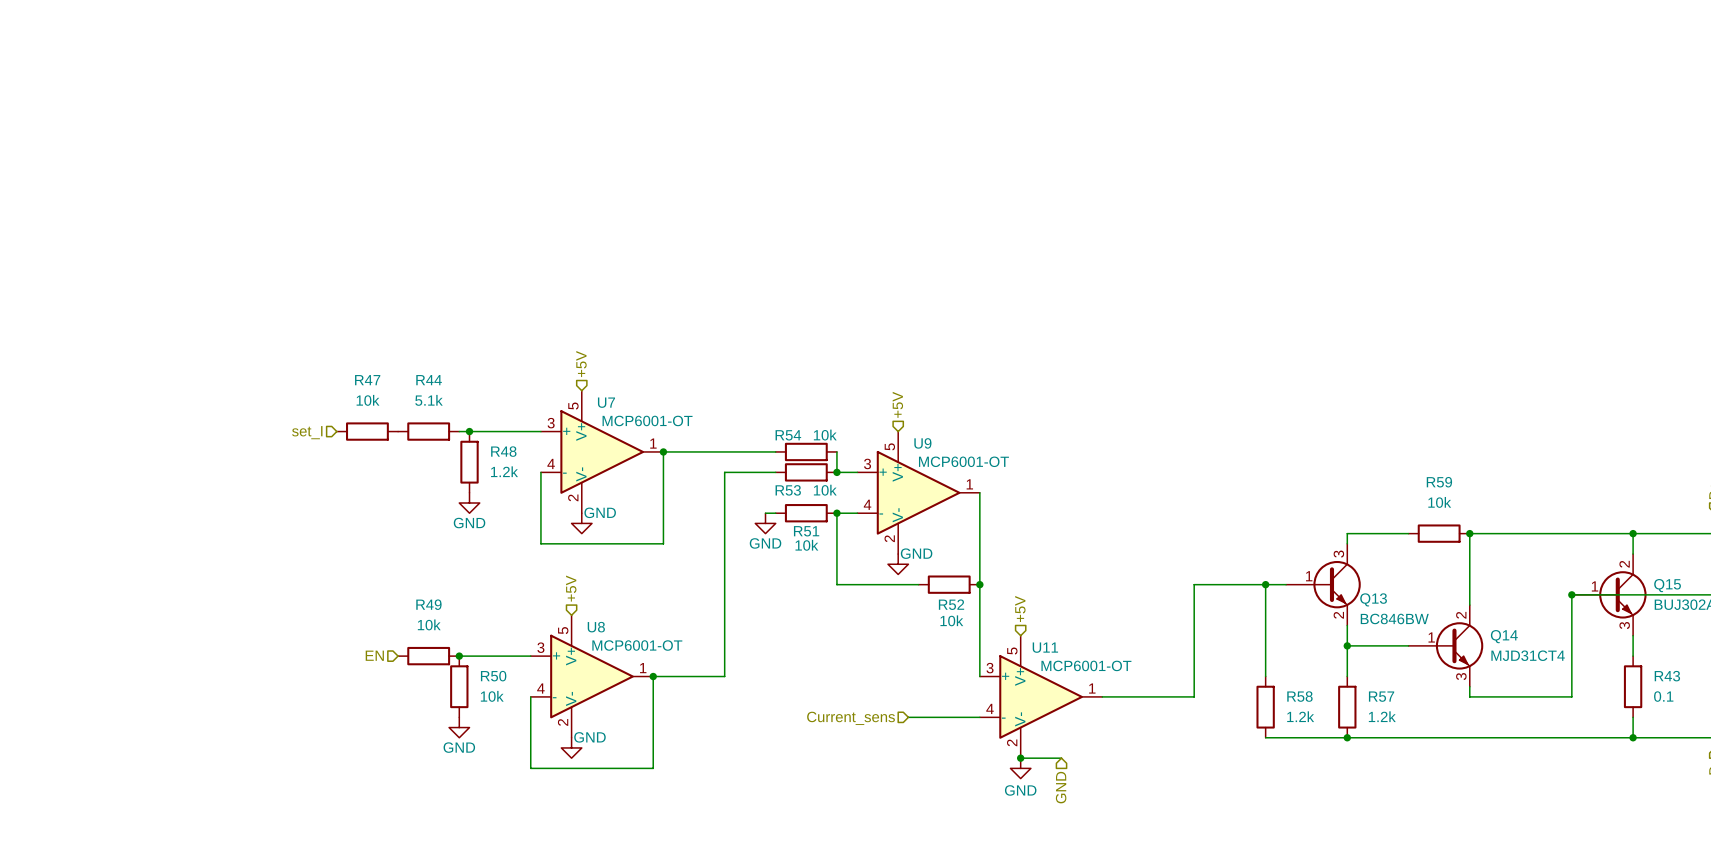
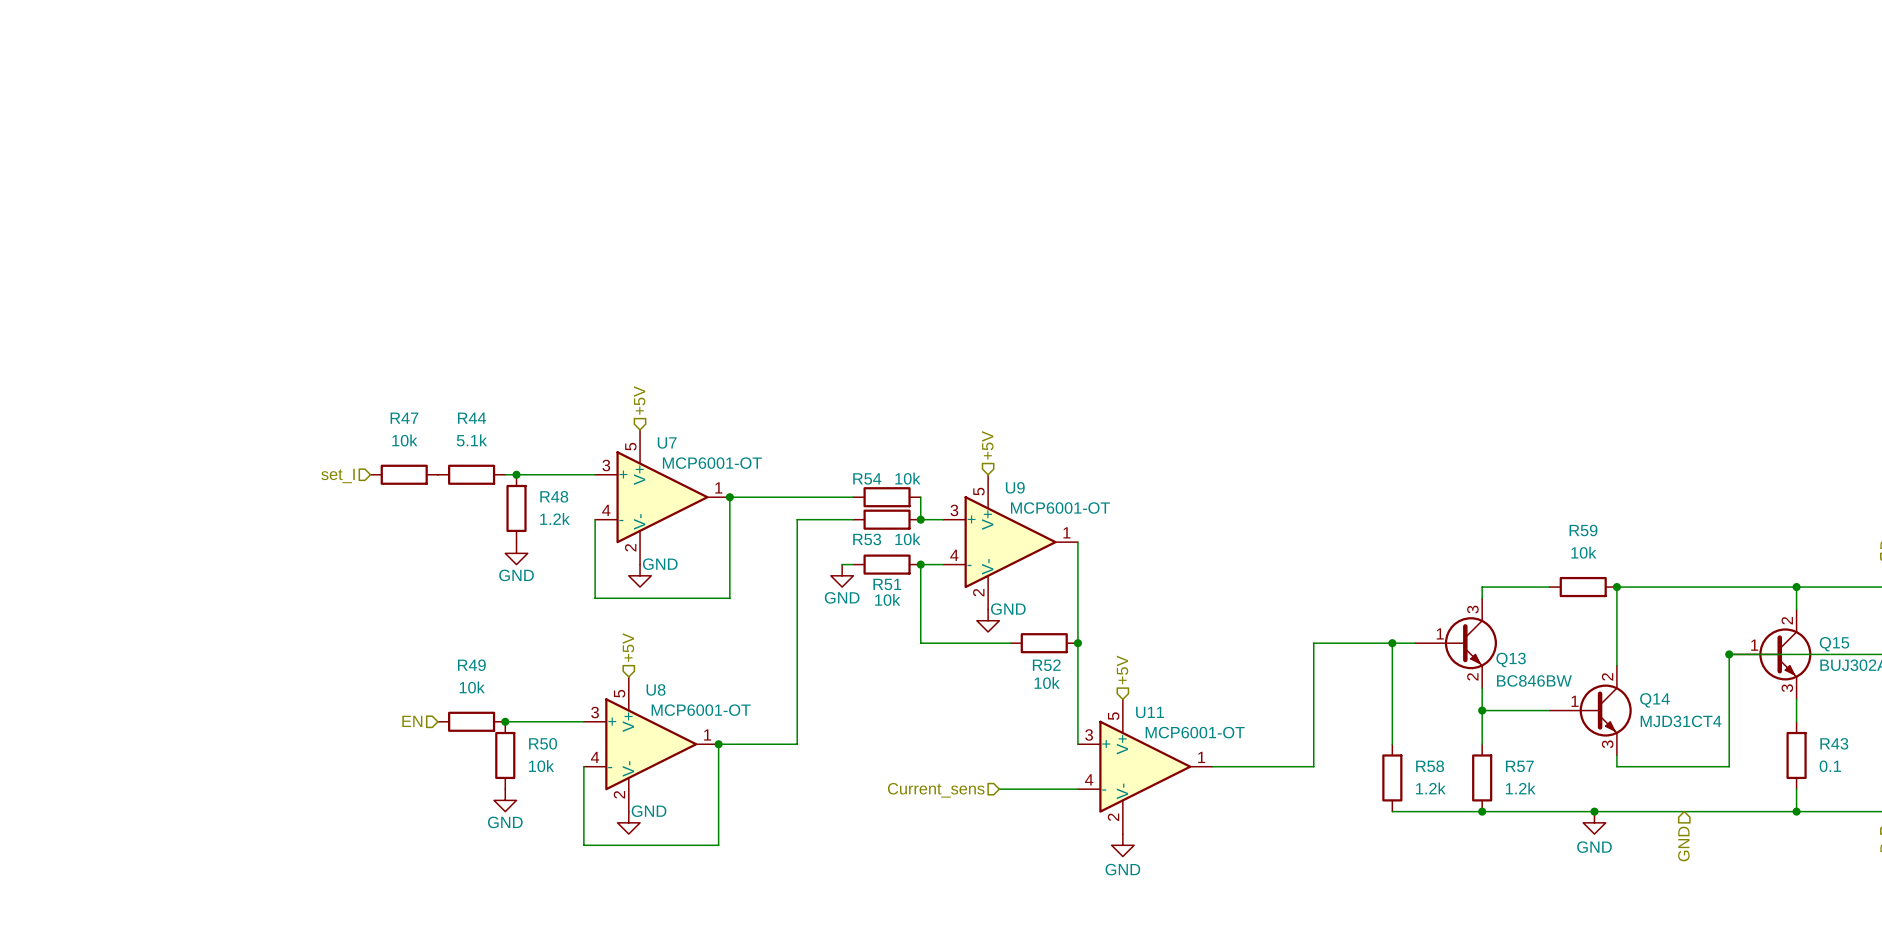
junction: none -> (1594, 811)
power symbol: none -> GND (1594, 822)
wire: (1020, 758) (1061, 758) -> none
junction: (1020, 758) -> none
hierarchical label: none -> GND (1683, 843)
hierarchical label: GND (1061, 787) -> none

